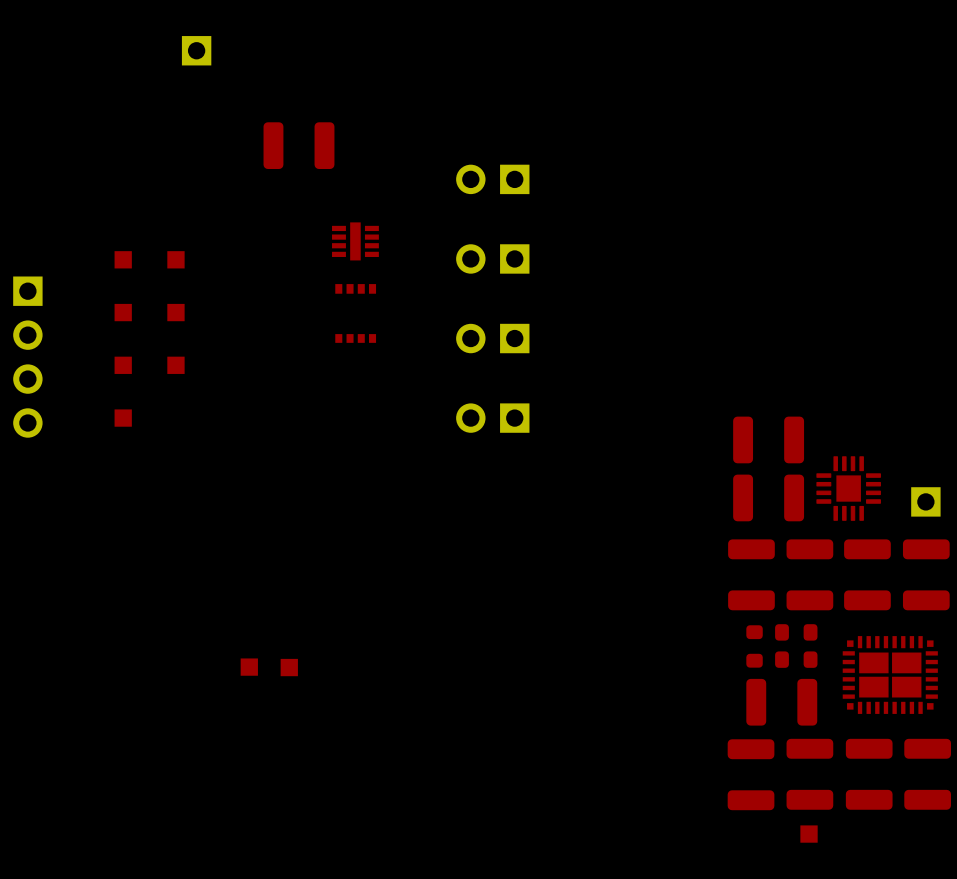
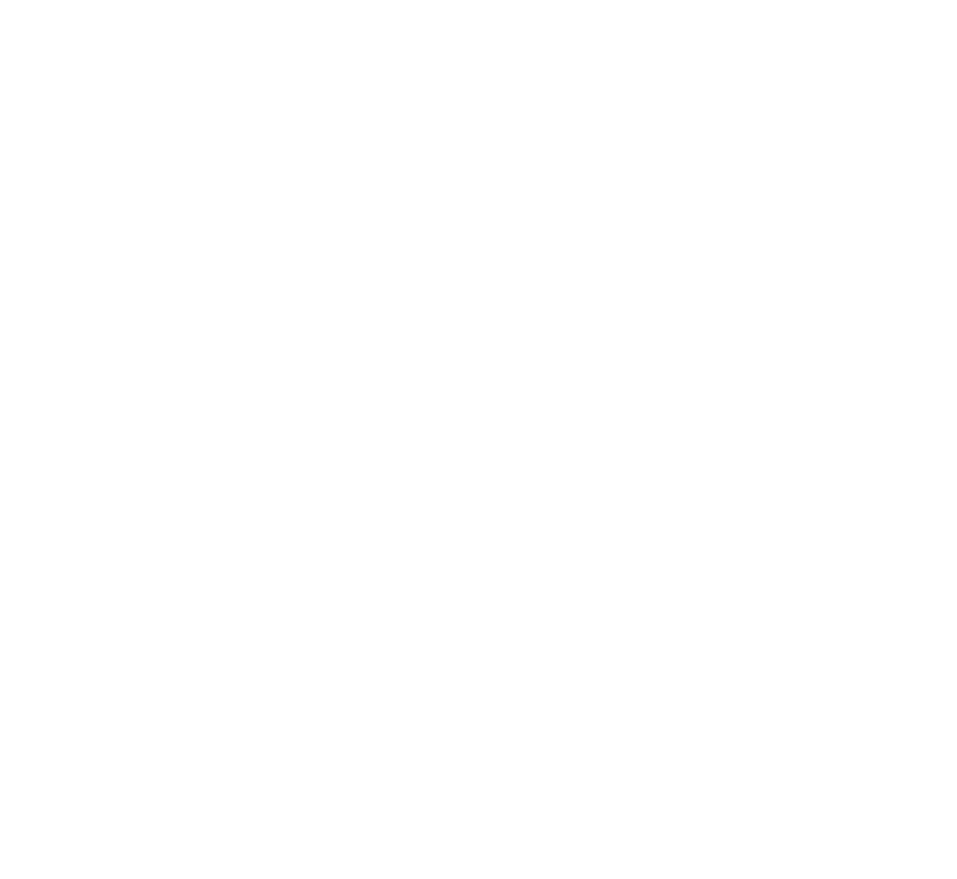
part: (196, 50) -> none
part: (298, 145) -> none
part: (492, 179) -> none
part: (355, 241) -> none
part: (492, 258) -> none
part: (123, 259) -> none
part: (175, 259) -> none
part: (123, 312) -> none
part: (175, 312) -> none
part: (355, 313) -> none
part: (492, 338) -> none
part: (27, 357) -> none
part: (123, 365) -> none
part: (175, 365) -> none
part: (123, 418) -> none
part: (492, 418) -> none
part: (768, 439) -> none
part: (848, 488) -> none
part: (768, 497) -> none
part: (925, 501) -> none
part: (751, 574) -> none
part: (809, 574) -> none
part: (867, 574) -> none
part: (926, 574) -> none
part: (796, 632) -> none
part: (754, 646) -> none
part: (796, 659) -> none
part: (249, 667) -> none
part: (289, 667) -> none
part: (890, 675) -> none
part: (781, 702) -> none
part: (751, 774) -> none
part: (809, 774) -> none
part: (869, 774) -> none
part: (927, 774) -> none
part: (809, 834) -> none

